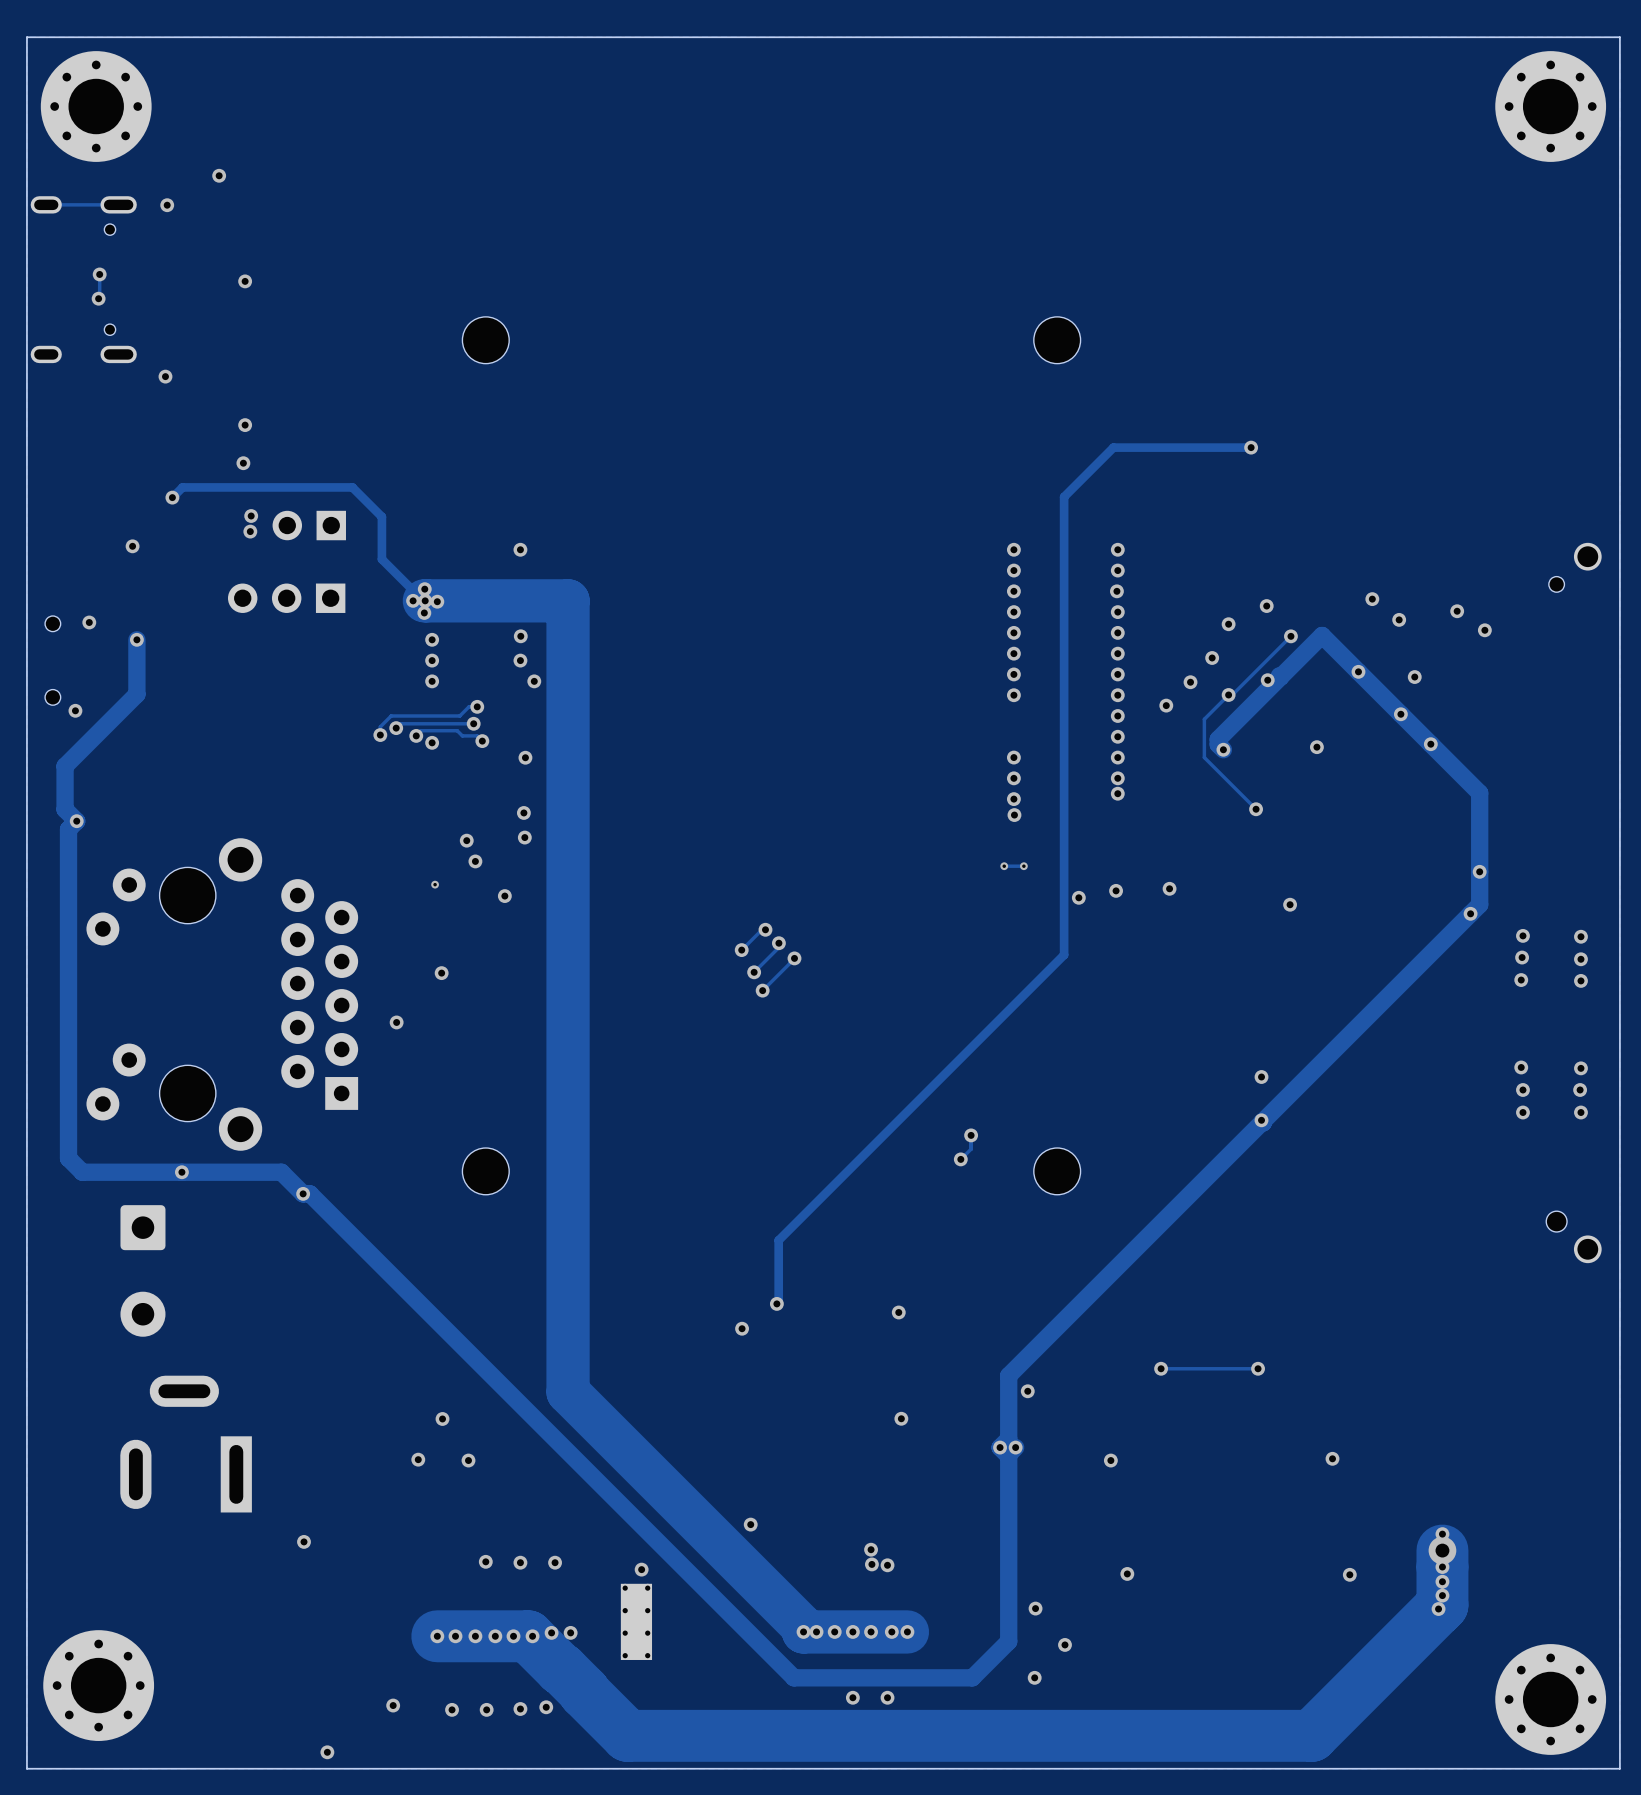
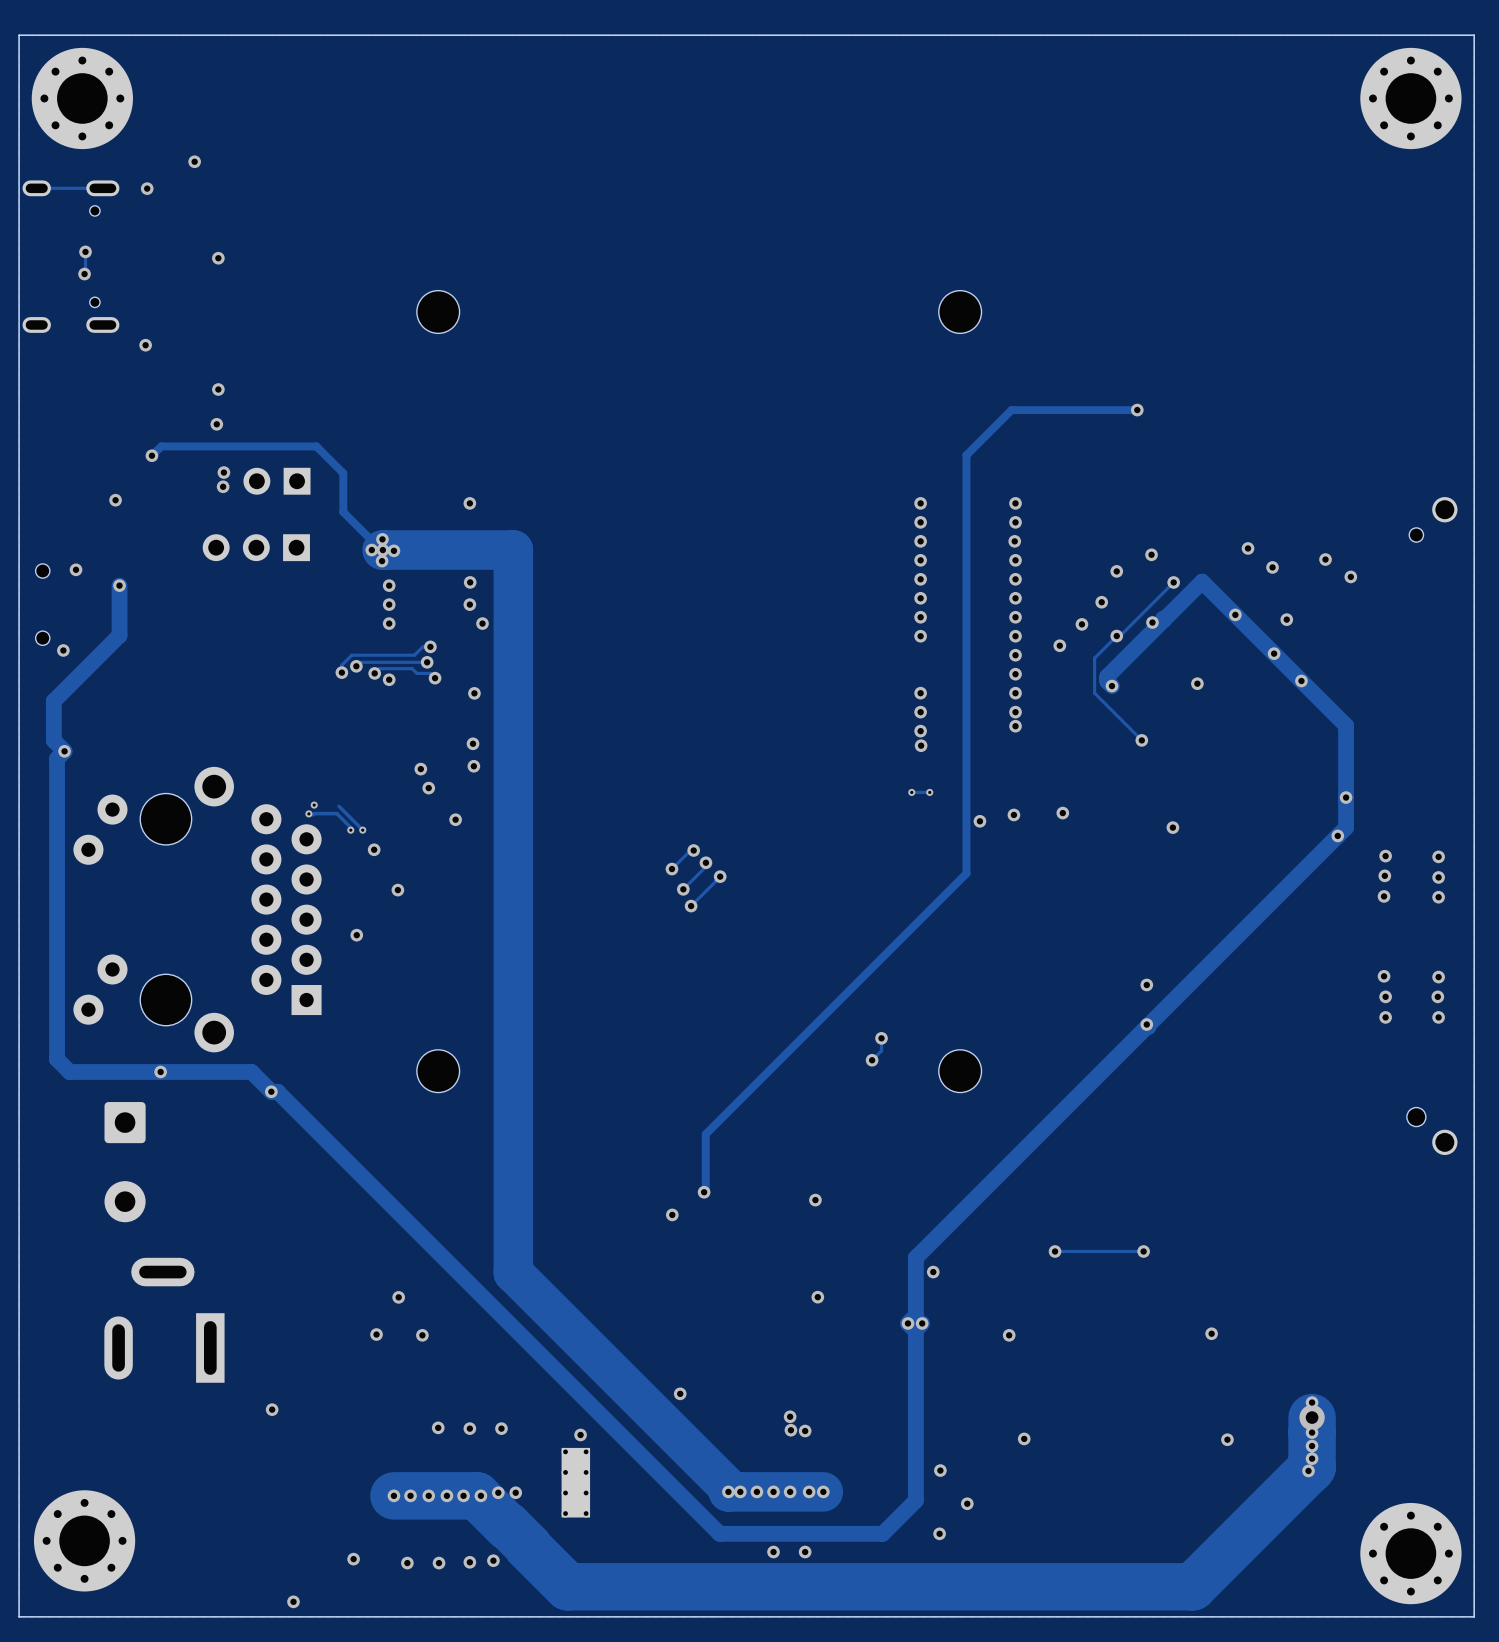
via: none -> (314, 805)
track: none -> (339, 806) (362, 830)
via: (435, 884) -> none
track: none -> (309, 813) (336, 813) (350, 827) (350, 830)
via: none -> (308, 813)
via: none -> (350, 830)
via: none -> (362, 830)
via: none -> (374, 849)

